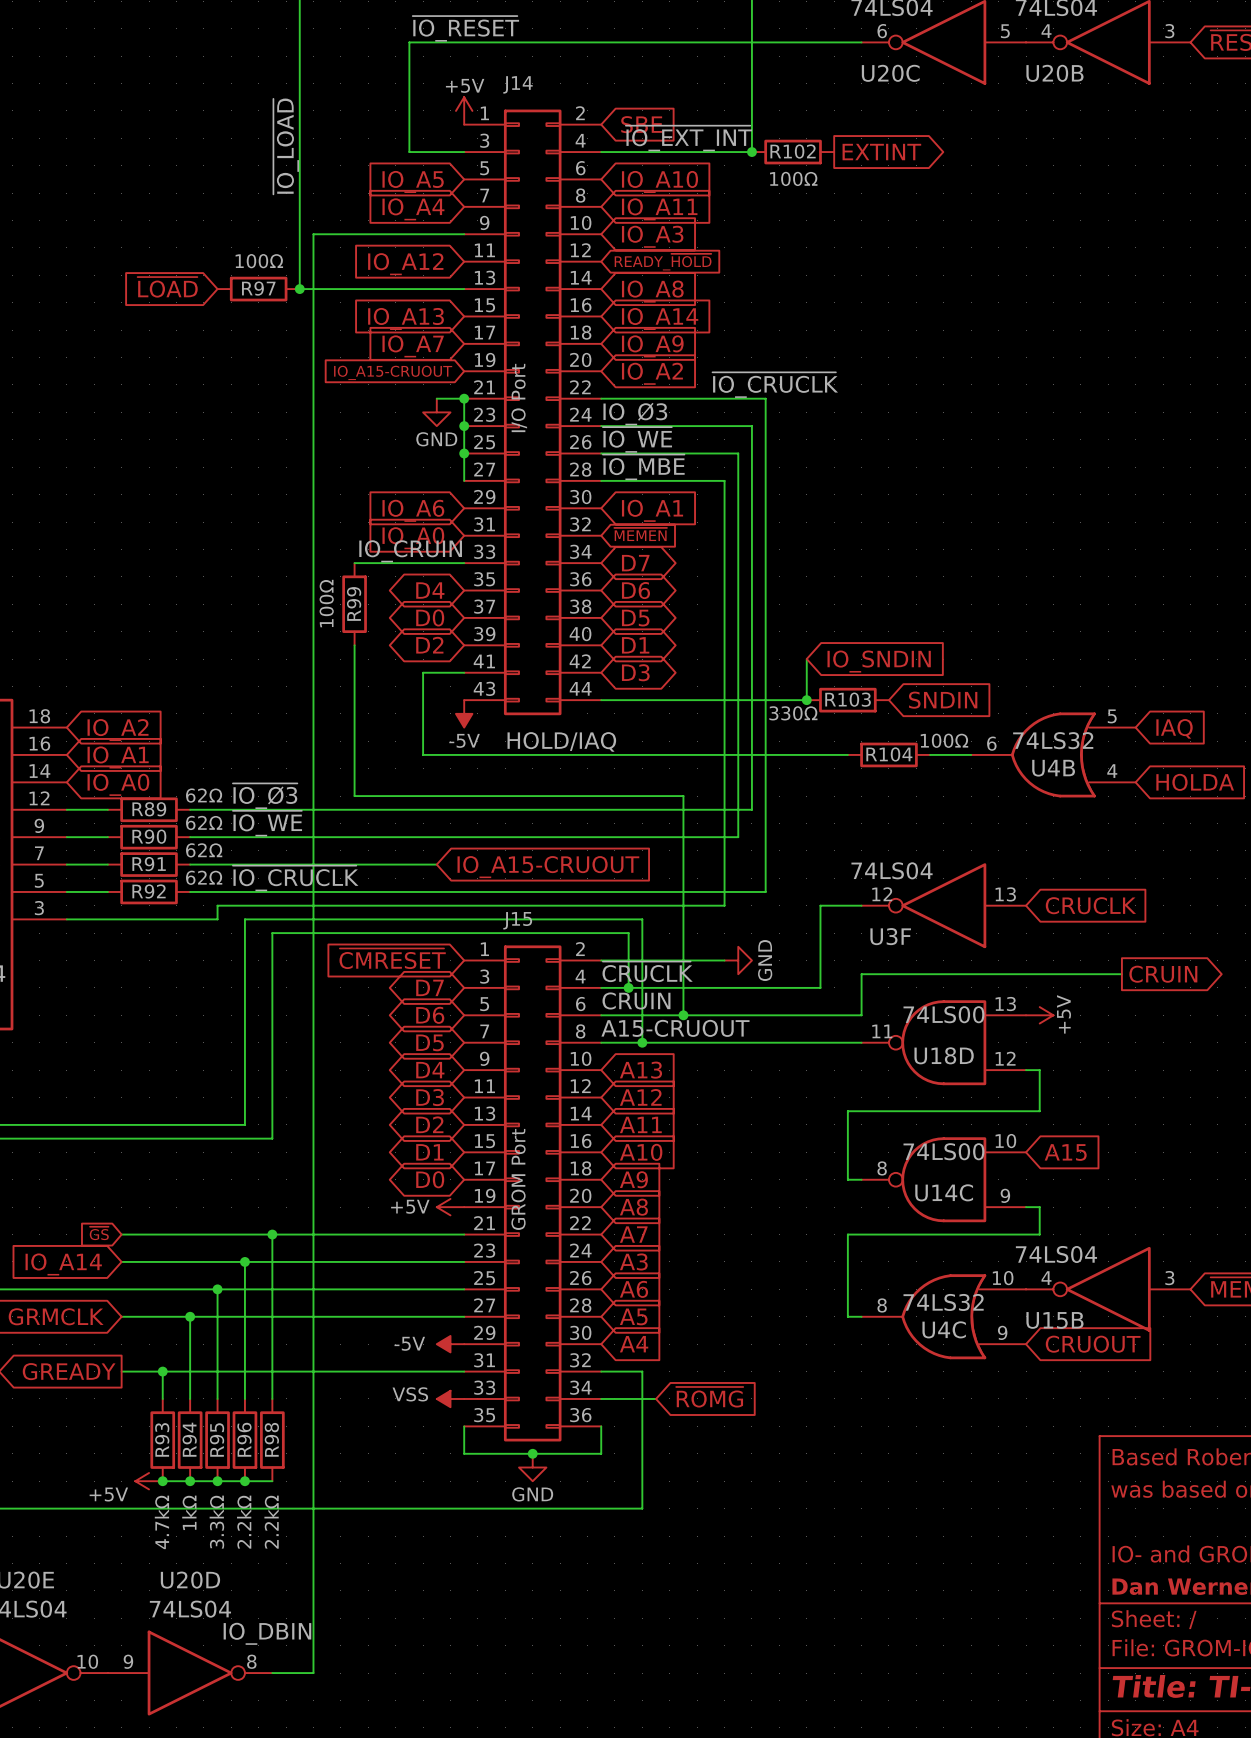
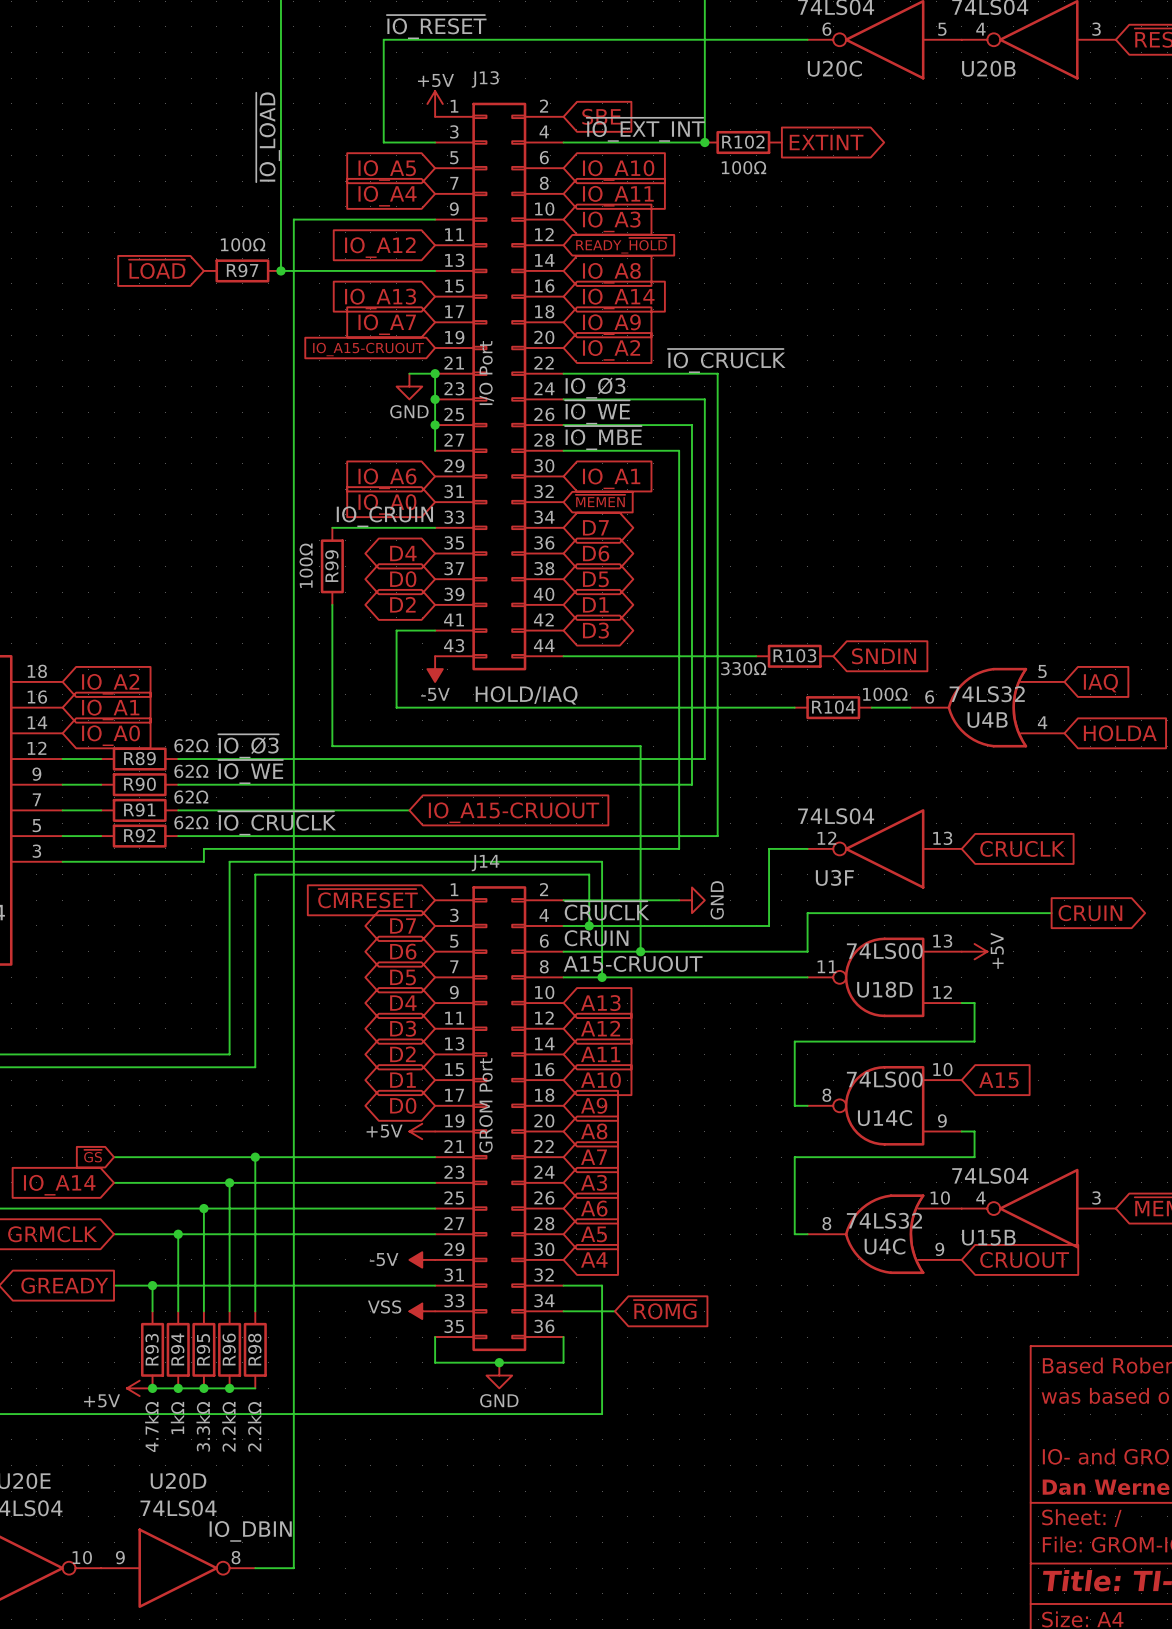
J14 name: J14 (518, 84) -> J13 (485, 79)
wire: (806, 659) (806, 700) -> none
global label: IO_SNDIN (879, 661) -> none
junction: (806, 700) -> none
J15 name: J15 (517, 920) -> J14 (485, 863)

